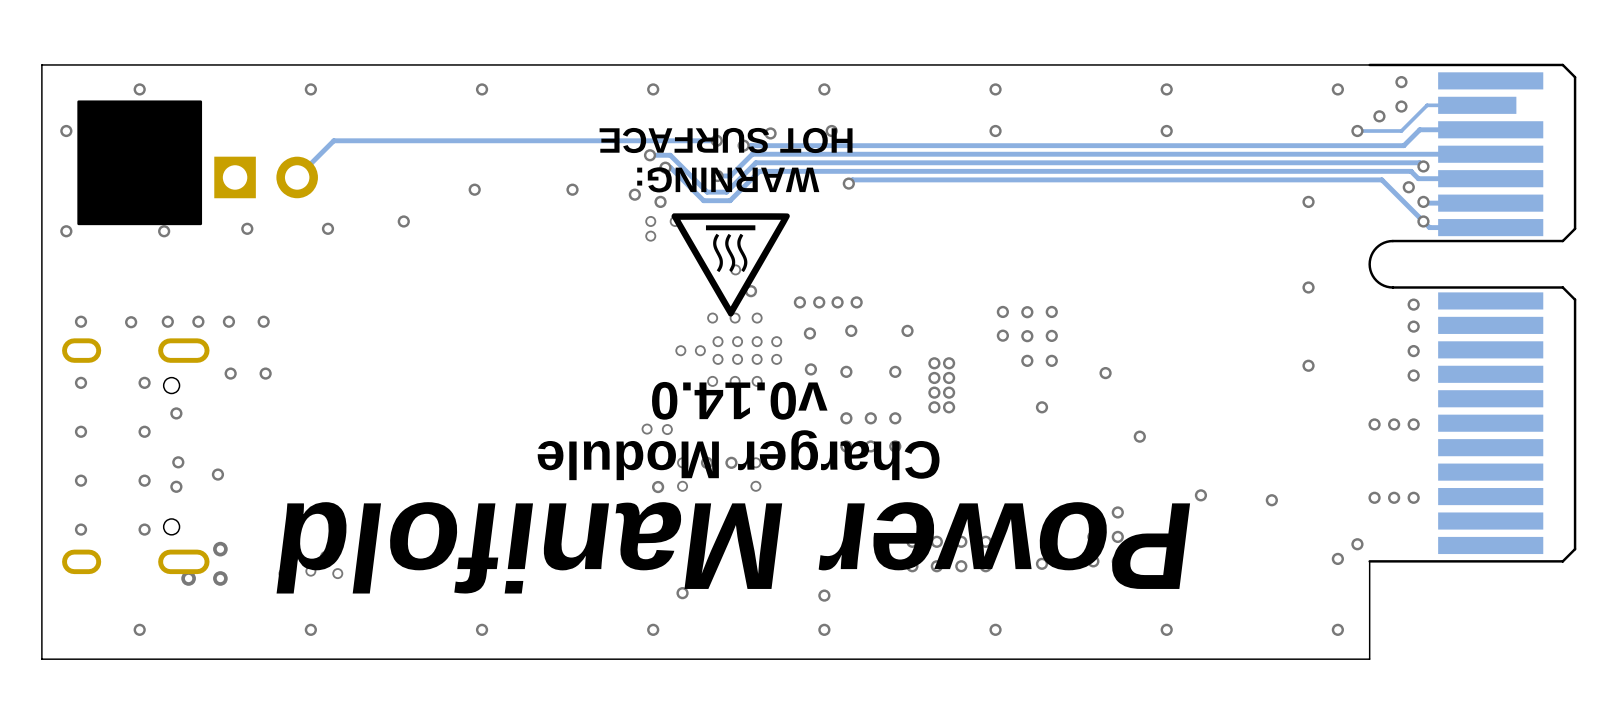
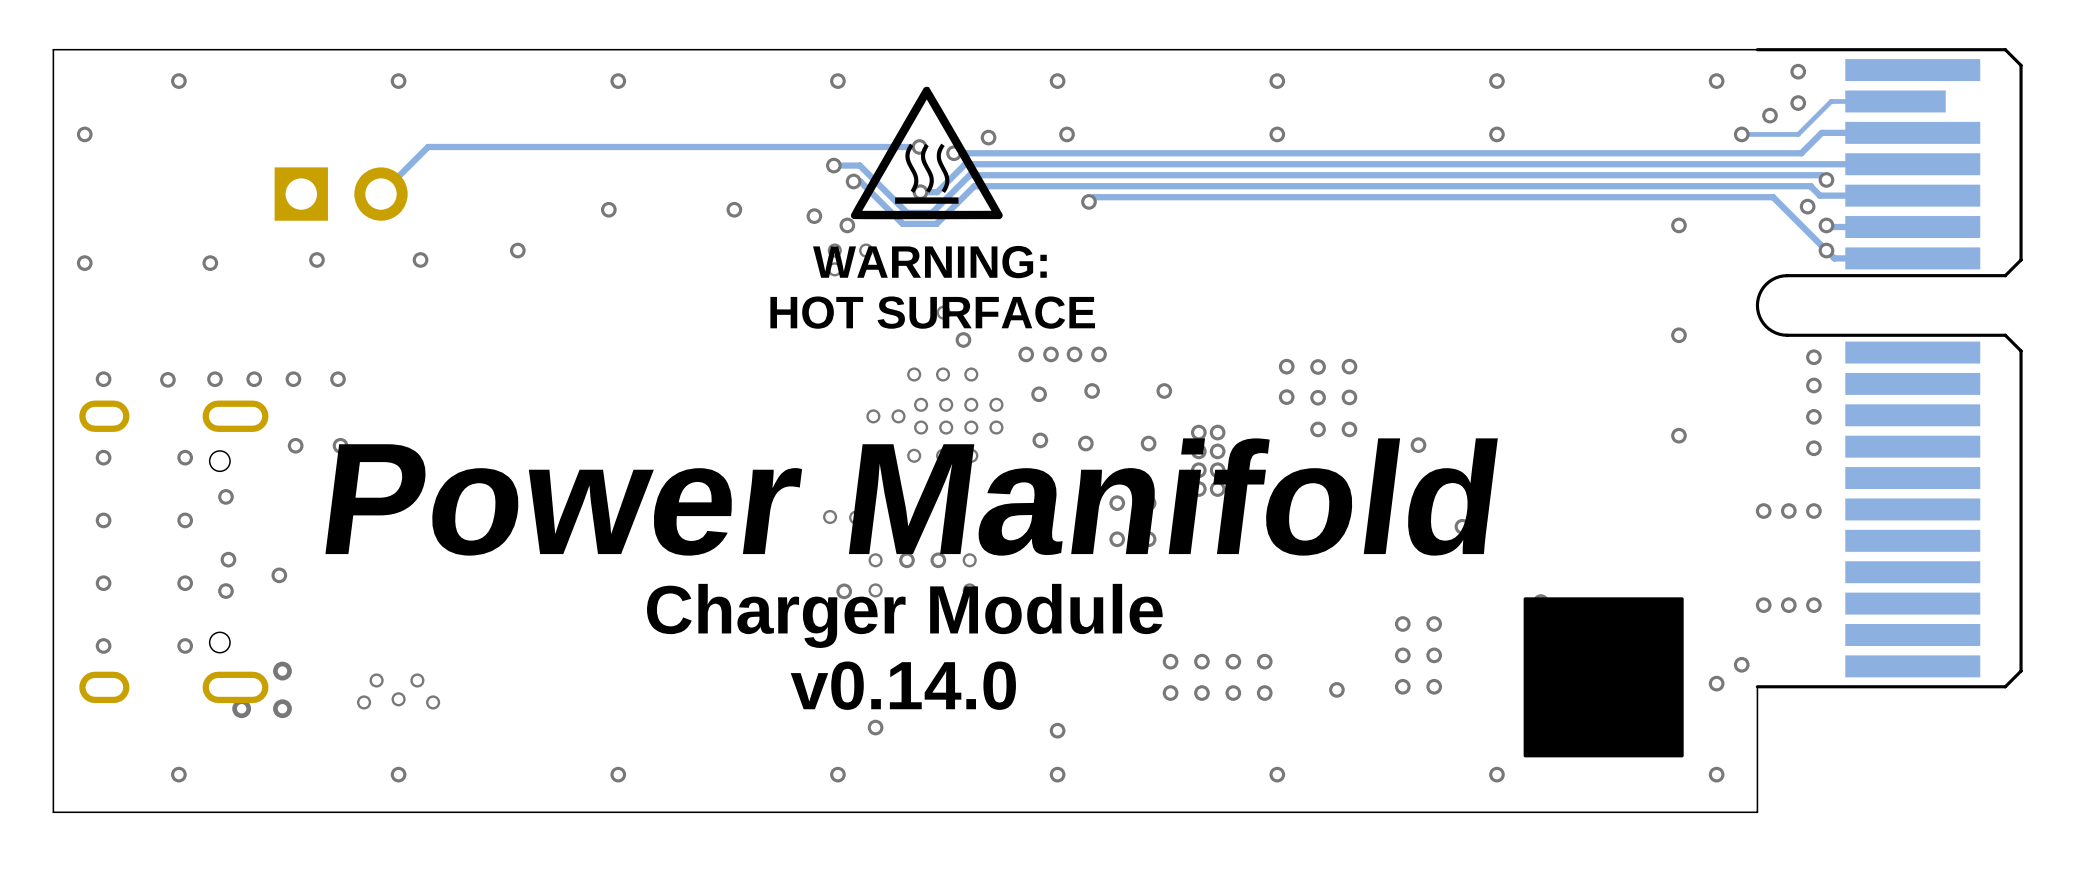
drawing: none -> [850, 86, 1003, 220]
drawing: [77, 100, 203, 226] -> none
text rotation: 0° (726, 140) -> 180° (932, 312)
text rotation: 0° (728, 179) -> 180° (929, 262)
drawing: [671, 213, 790, 317] -> none
text rotation: 0° (739, 400) -> 180° (903, 685)
text rotation: 0° (738, 455) -> 180° (904, 615)
drawing: none -> [1523, 597, 1684, 758]
text rotation: 0° (733, 547) -> 180° (911, 497)

